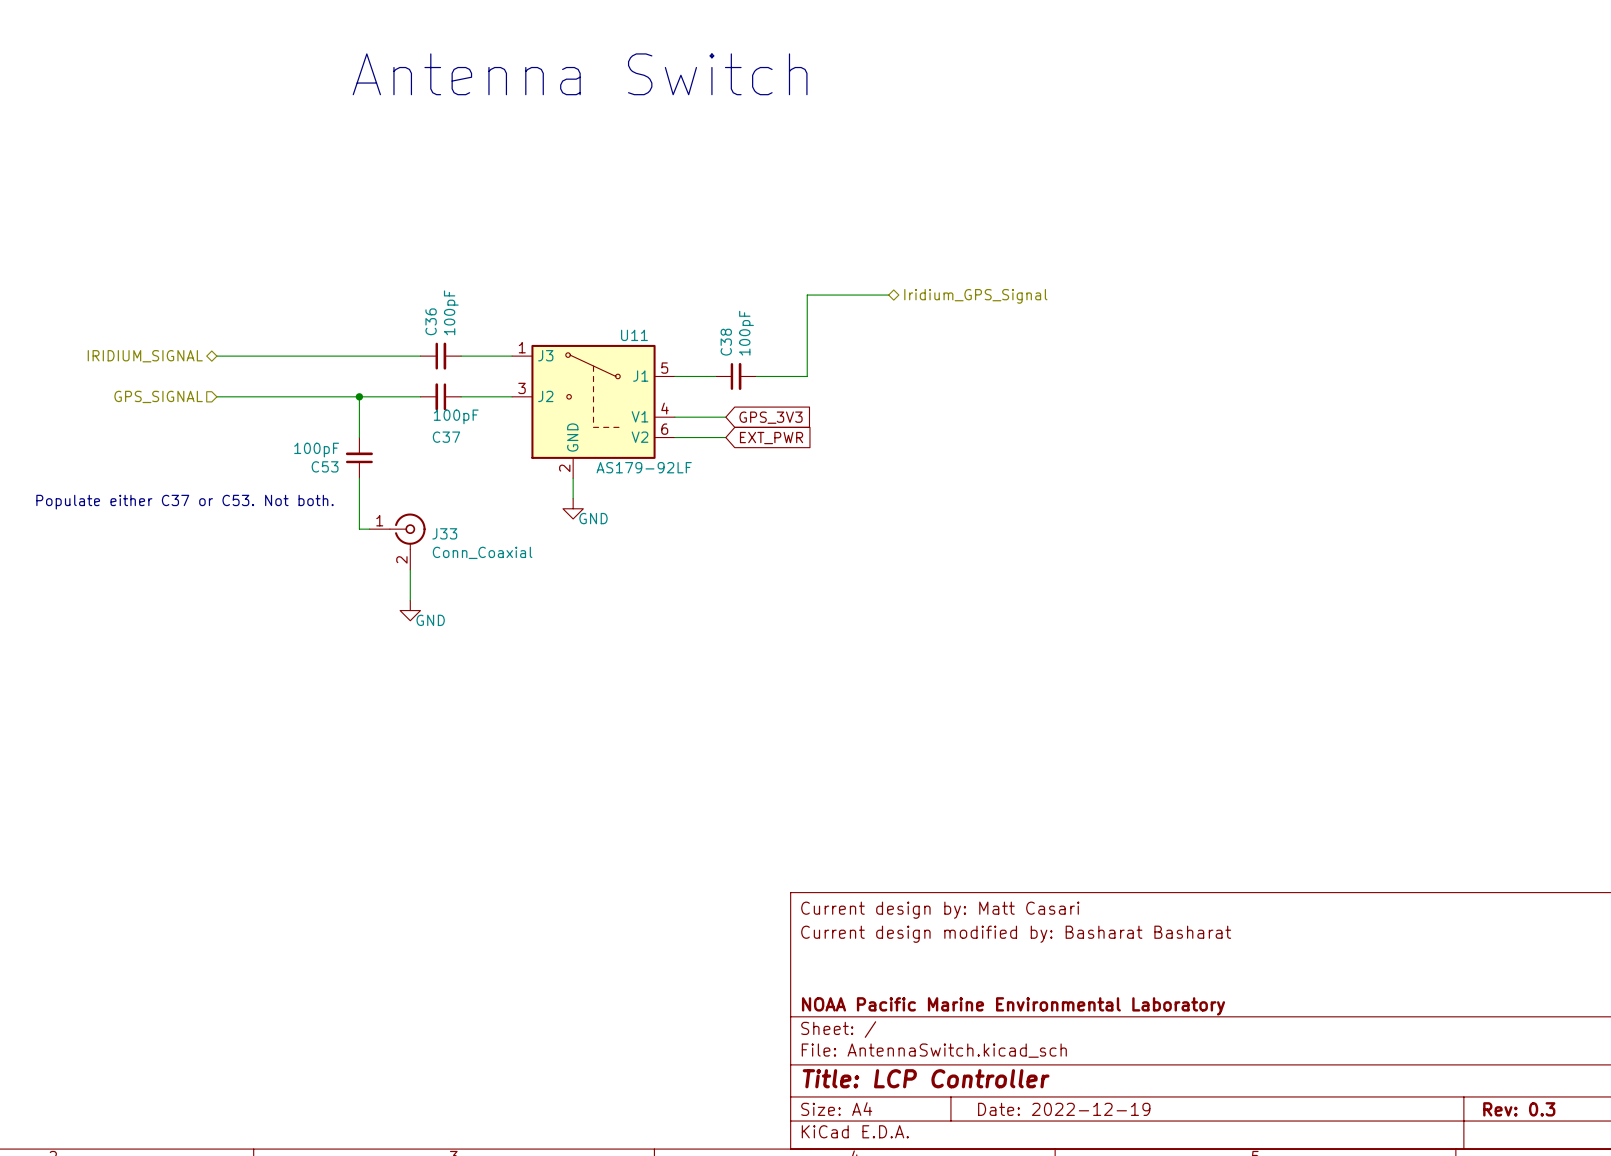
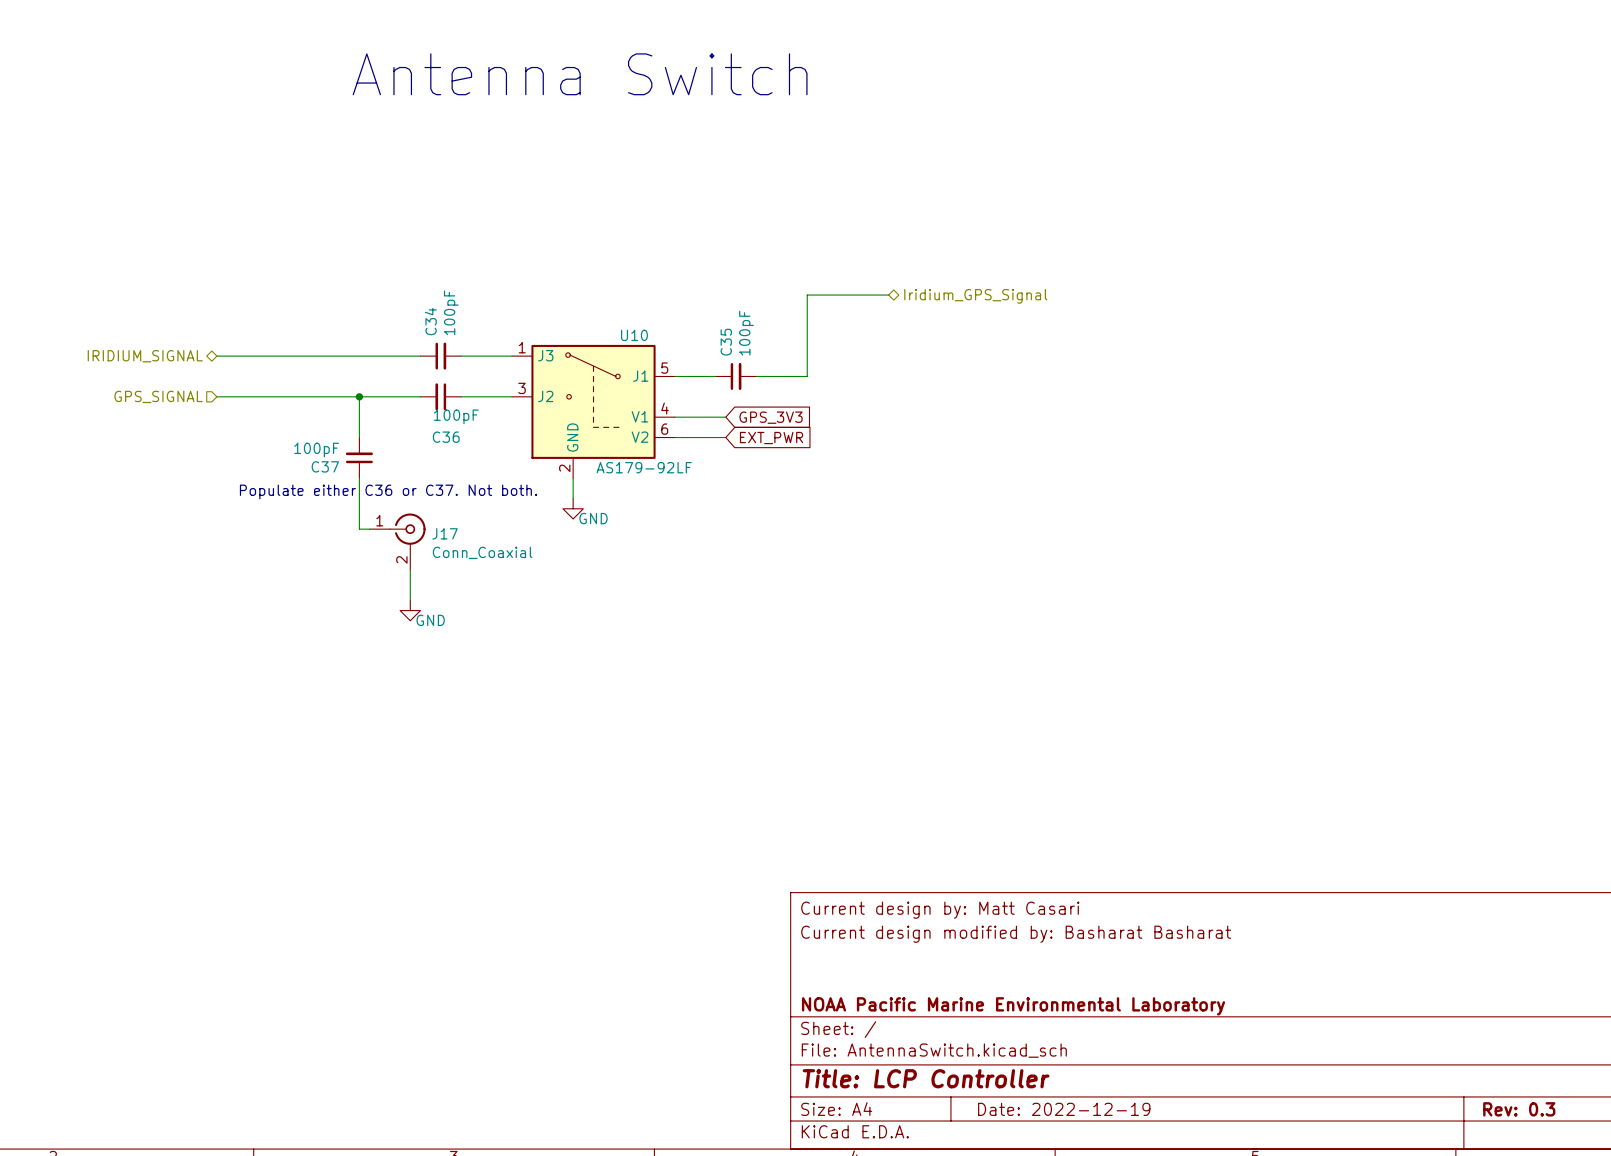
C36 name: C36 (431, 321) -> C34 (430, 321)
U11 name: U11 (634, 335) -> U10 (634, 335)
C38 name: C38 (726, 342) -> C35 (726, 342)
C37 name: C37 (446, 437) -> C36 (446, 437)
C53 name: C53 (325, 466) -> C37 (325, 466)
text: none -> Populate either C36 or C37. Not both. (388, 491)
text: Populate either C37 or C53. Not both. (184, 502) -> none
J33 name: J33 (444, 533) -> J17 (445, 533)

